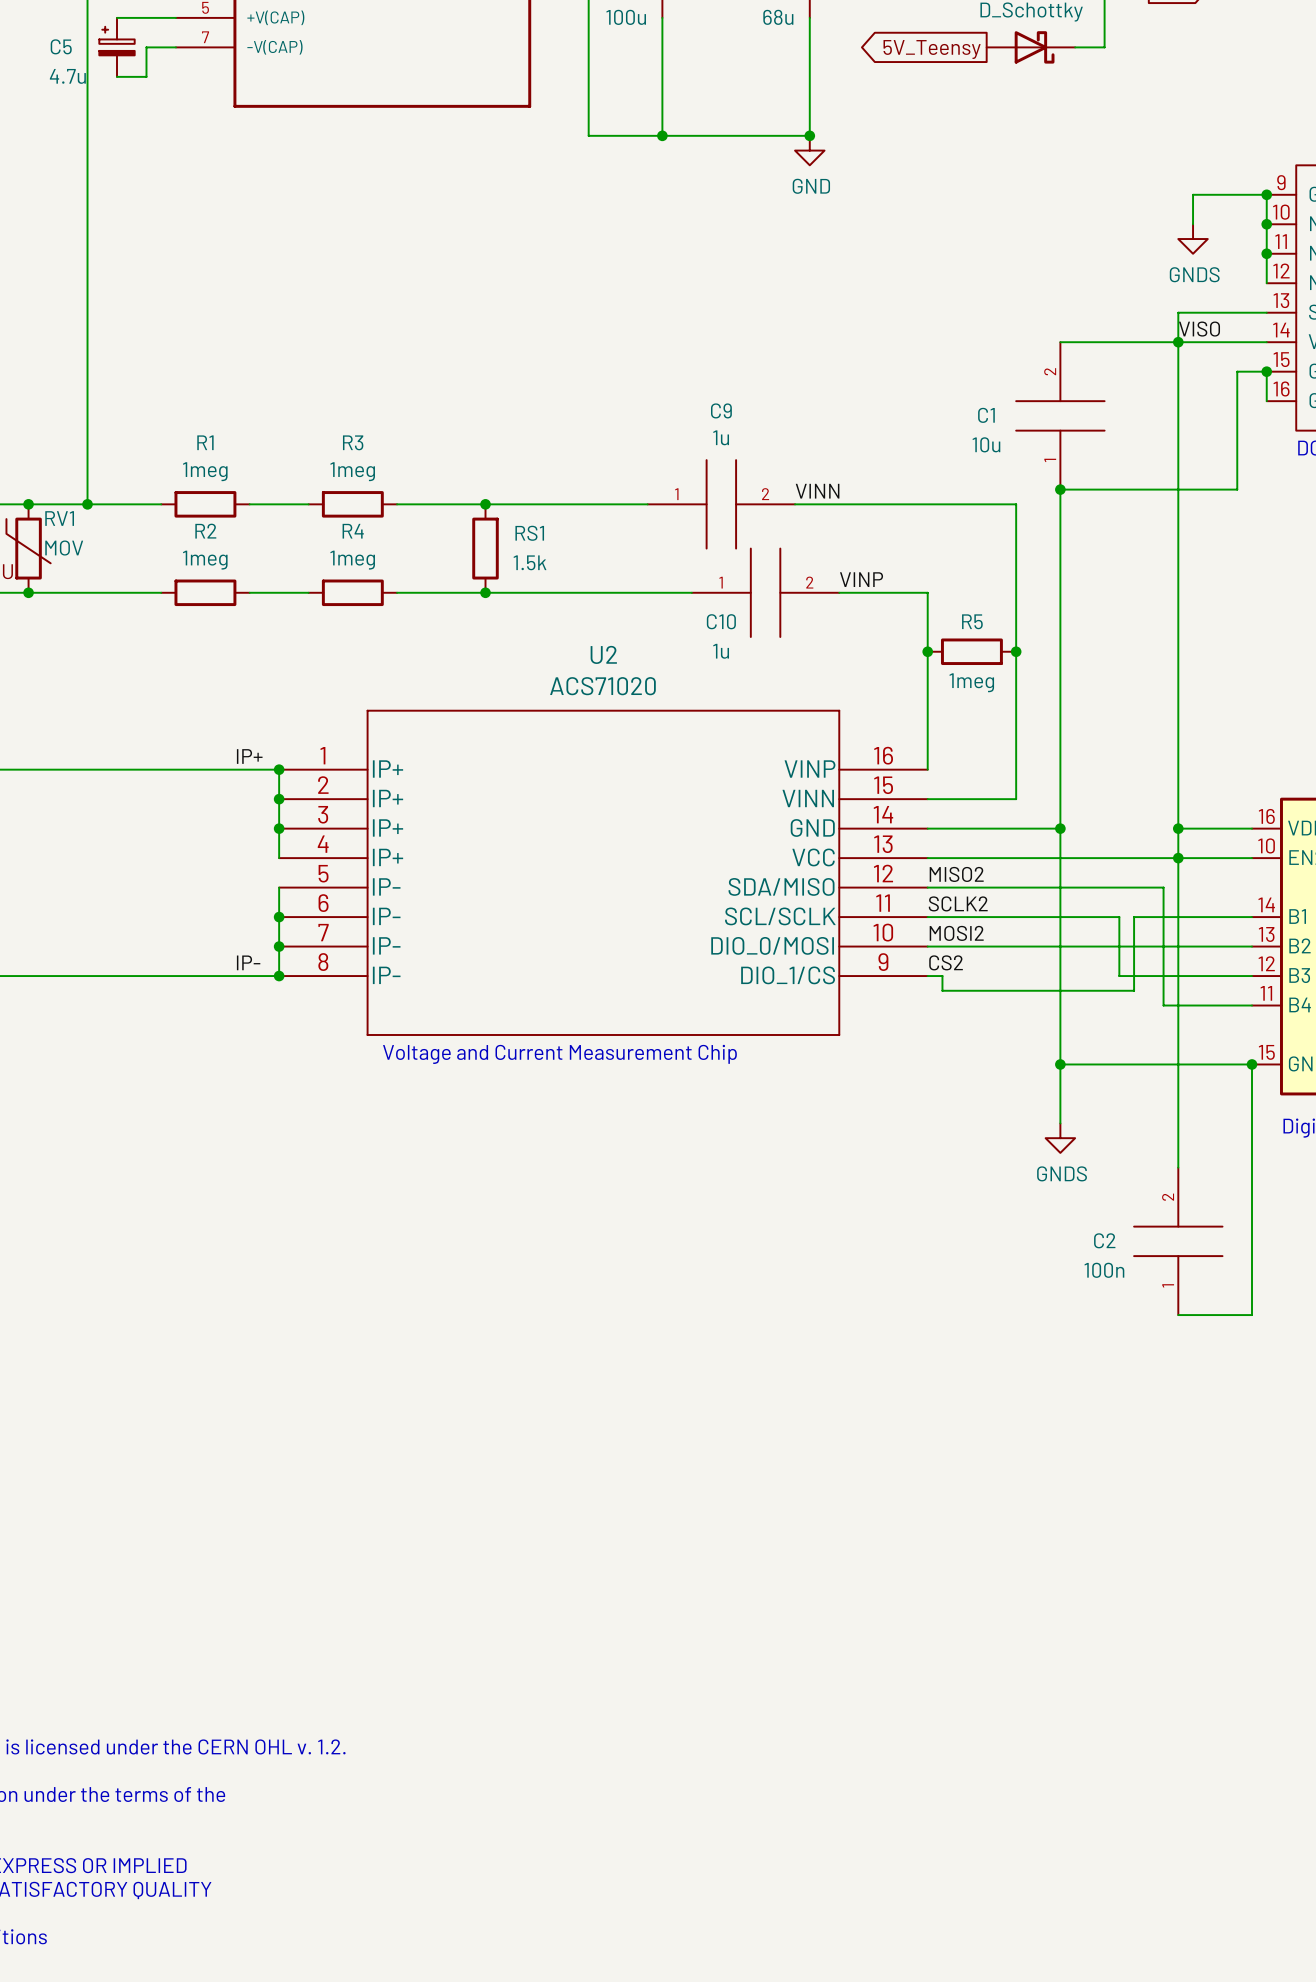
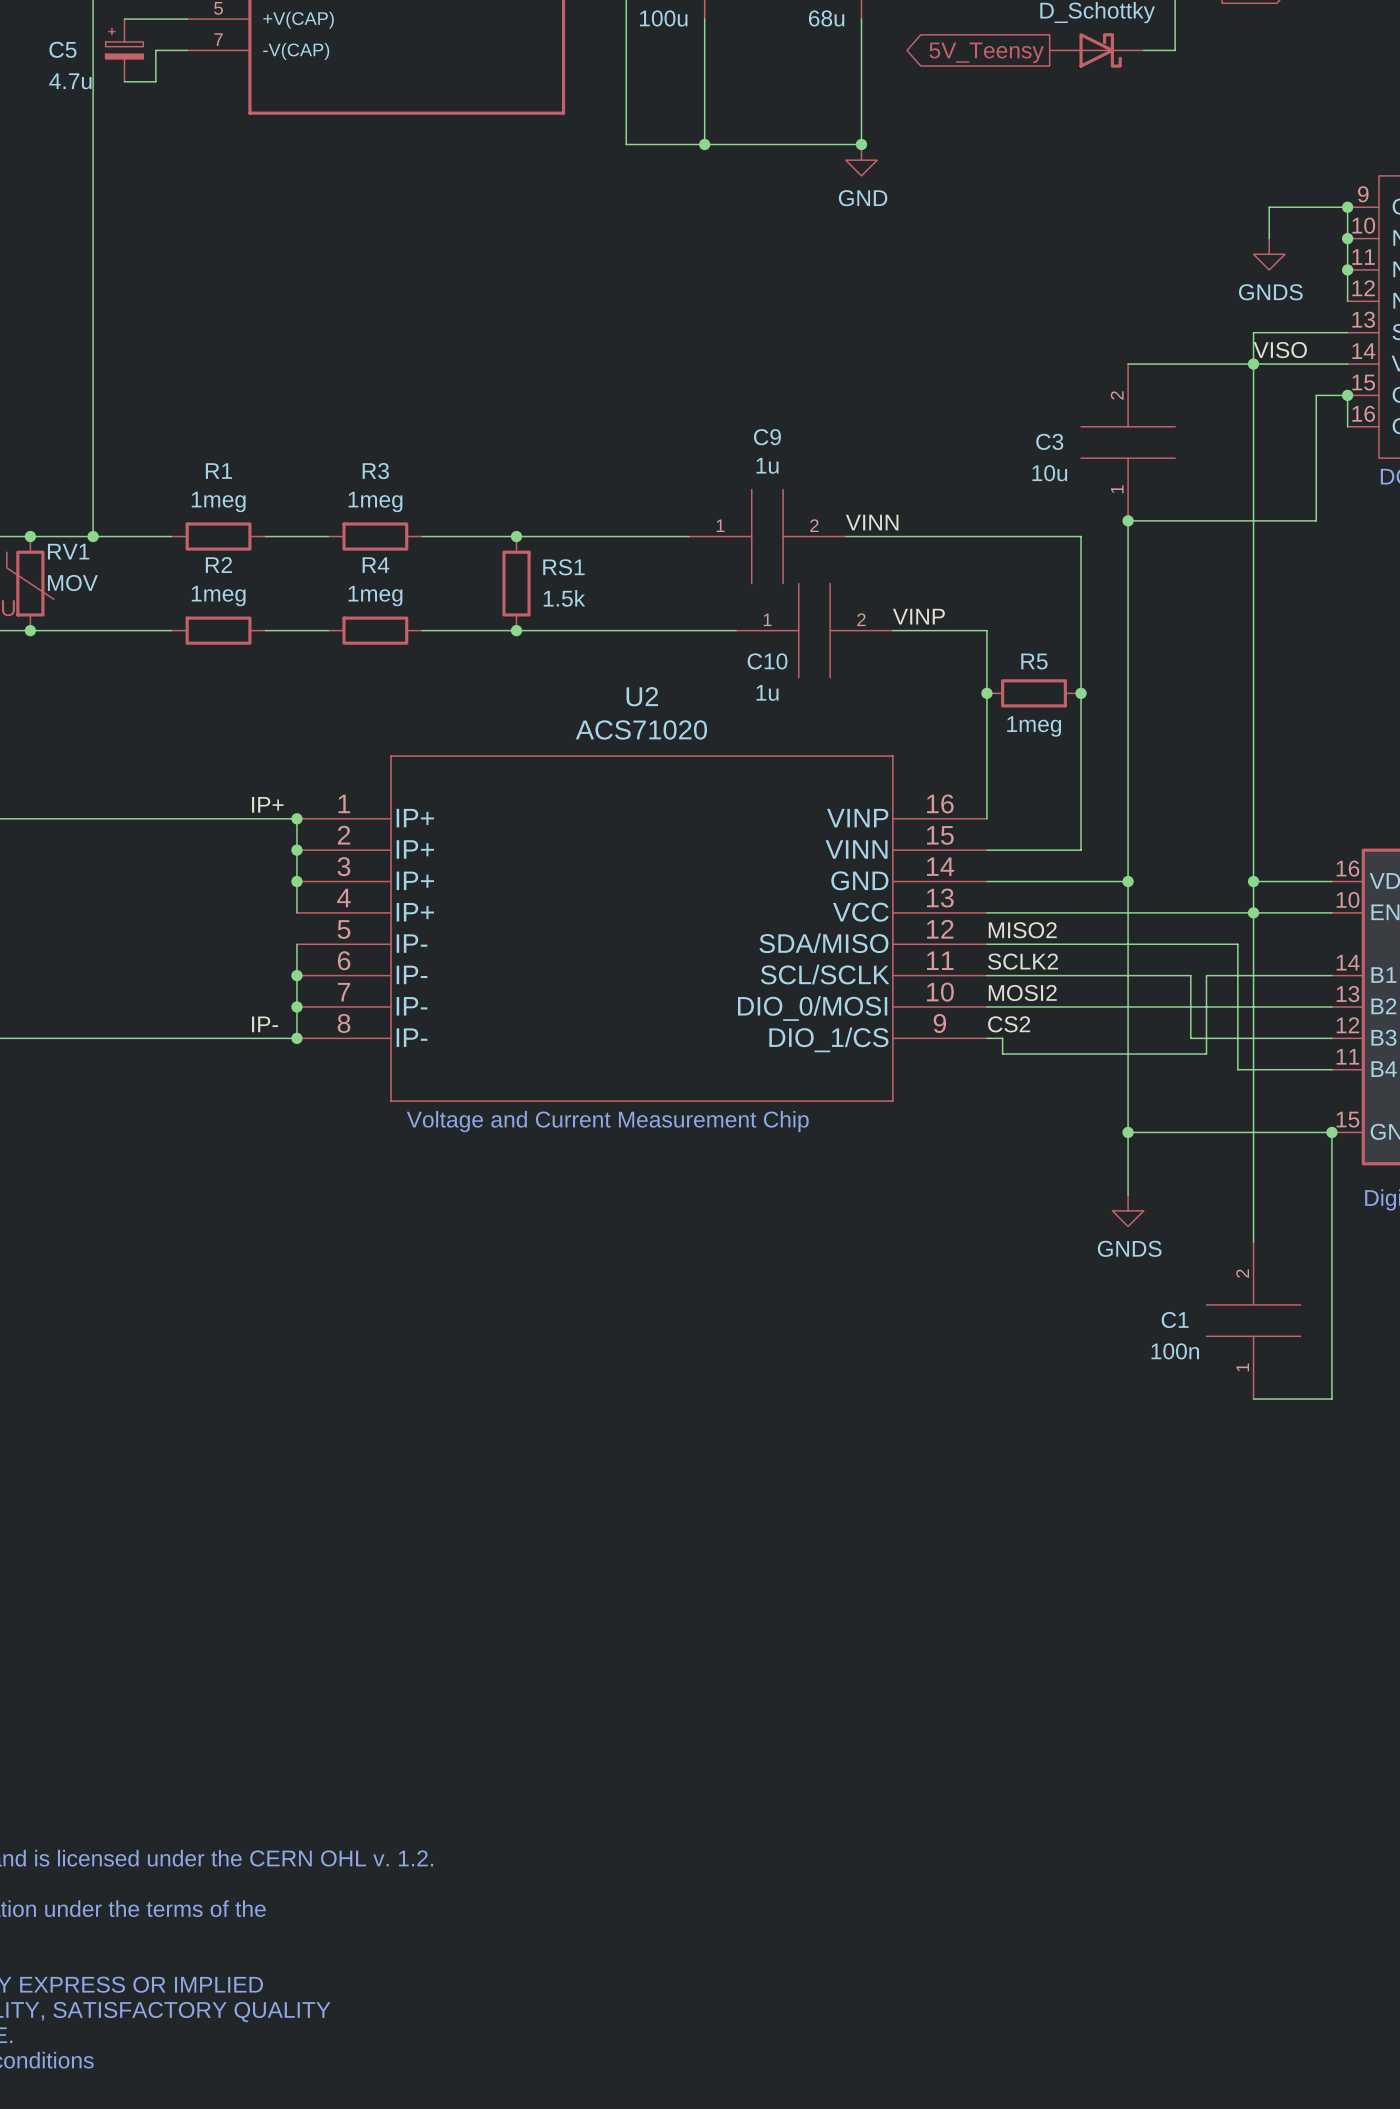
C1 name: C1 (986, 415) -> C3 (1049, 441)
C2 name: C2 (1104, 1240) -> C1 (1175, 1320)

